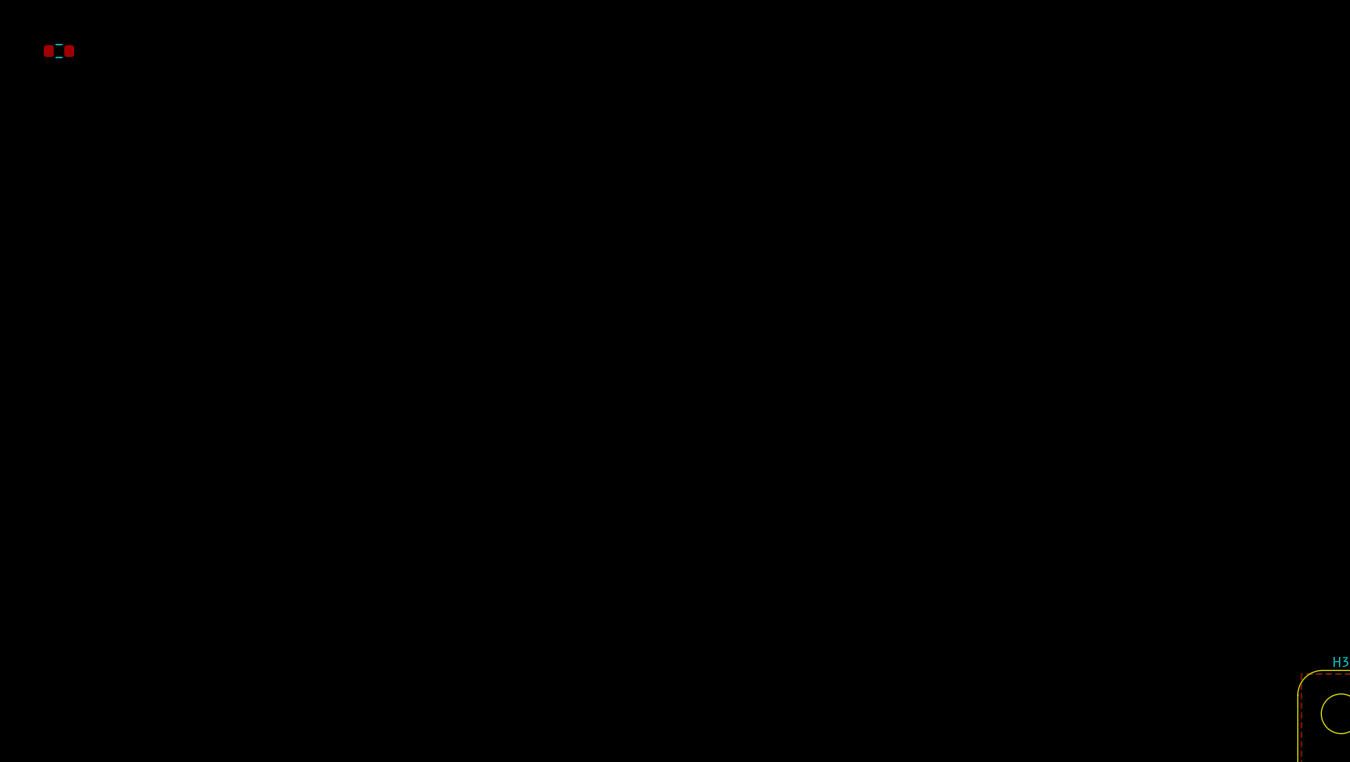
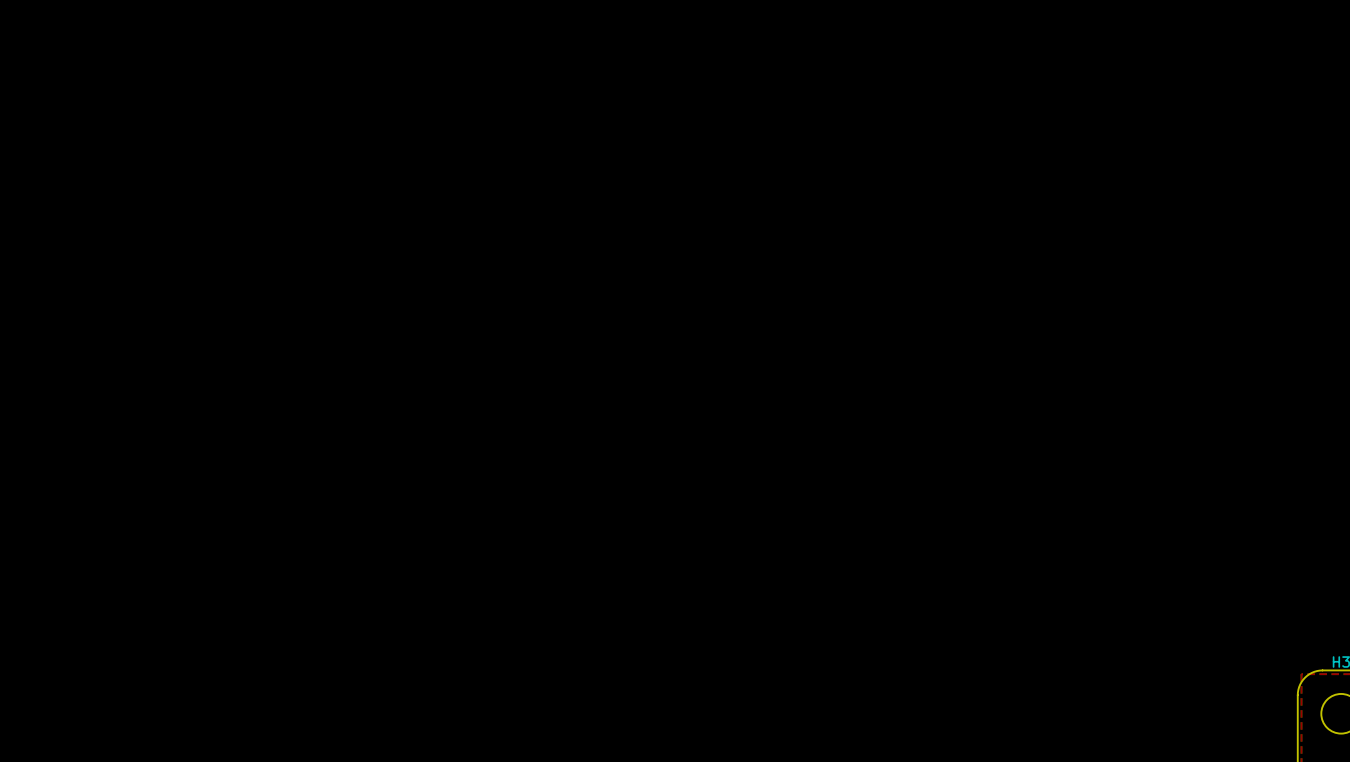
part: (58, 51) -> none

